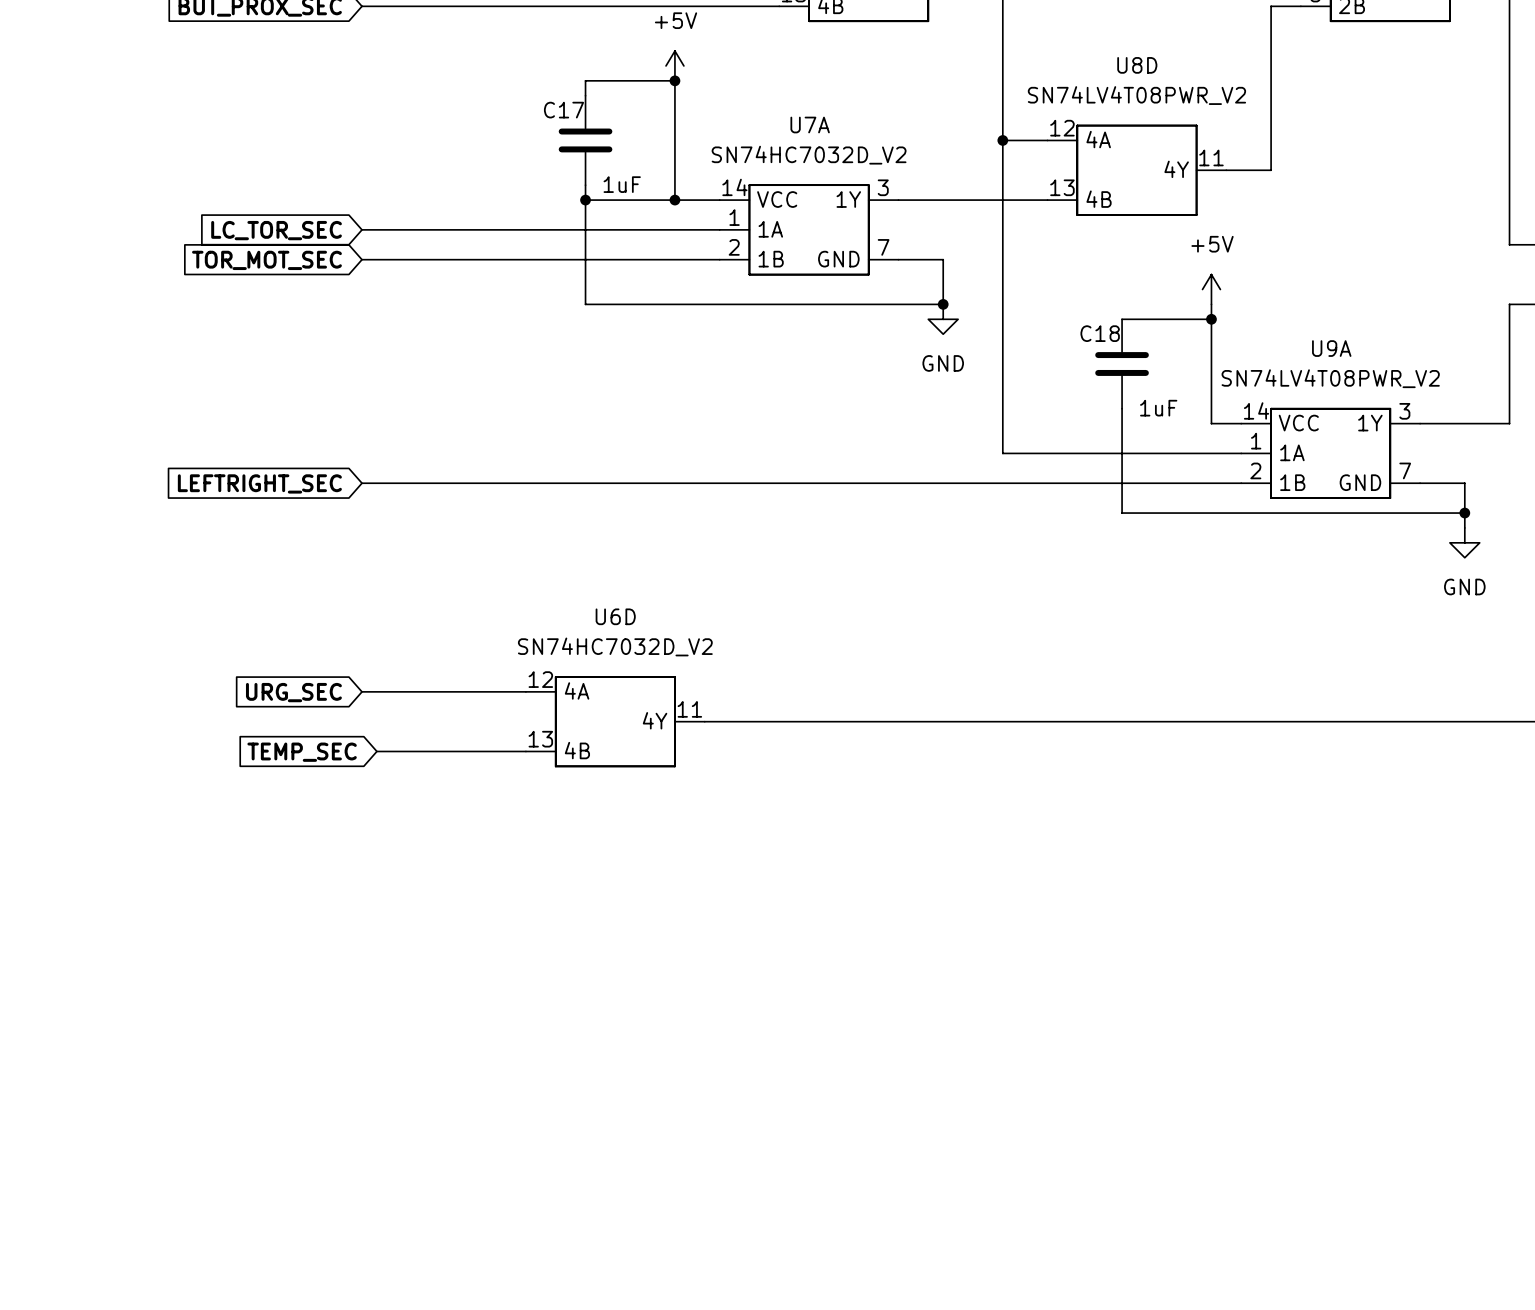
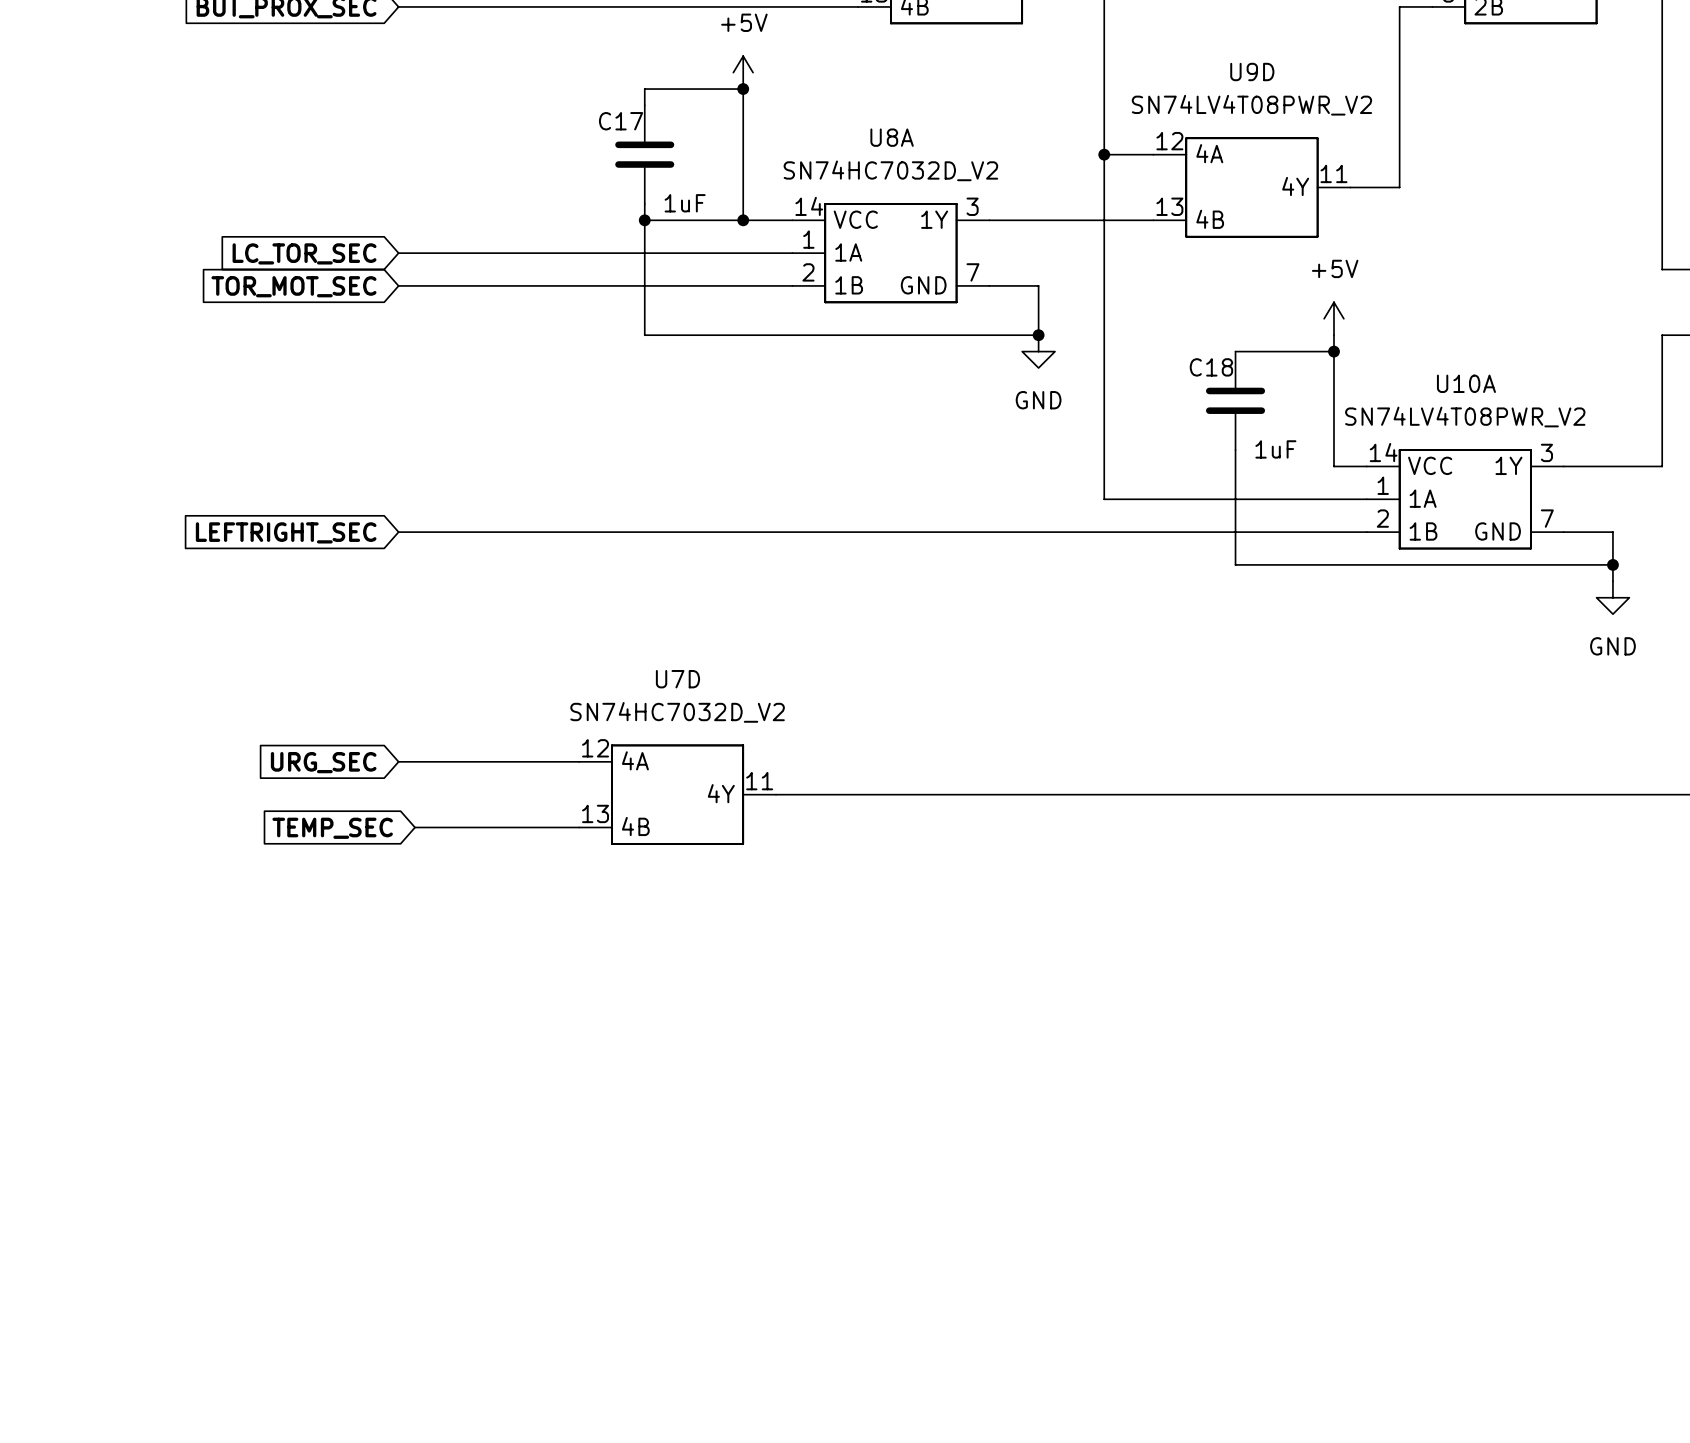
U8D name: U8D (1137, 65) -> U9D (1252, 72)
U7A name: U7A (810, 125) -> U8A (892, 137)
U9A name: U9A (1331, 348) -> U10A (1466, 383)
U6D name: U6D (615, 616) -> U7D (677, 679)

